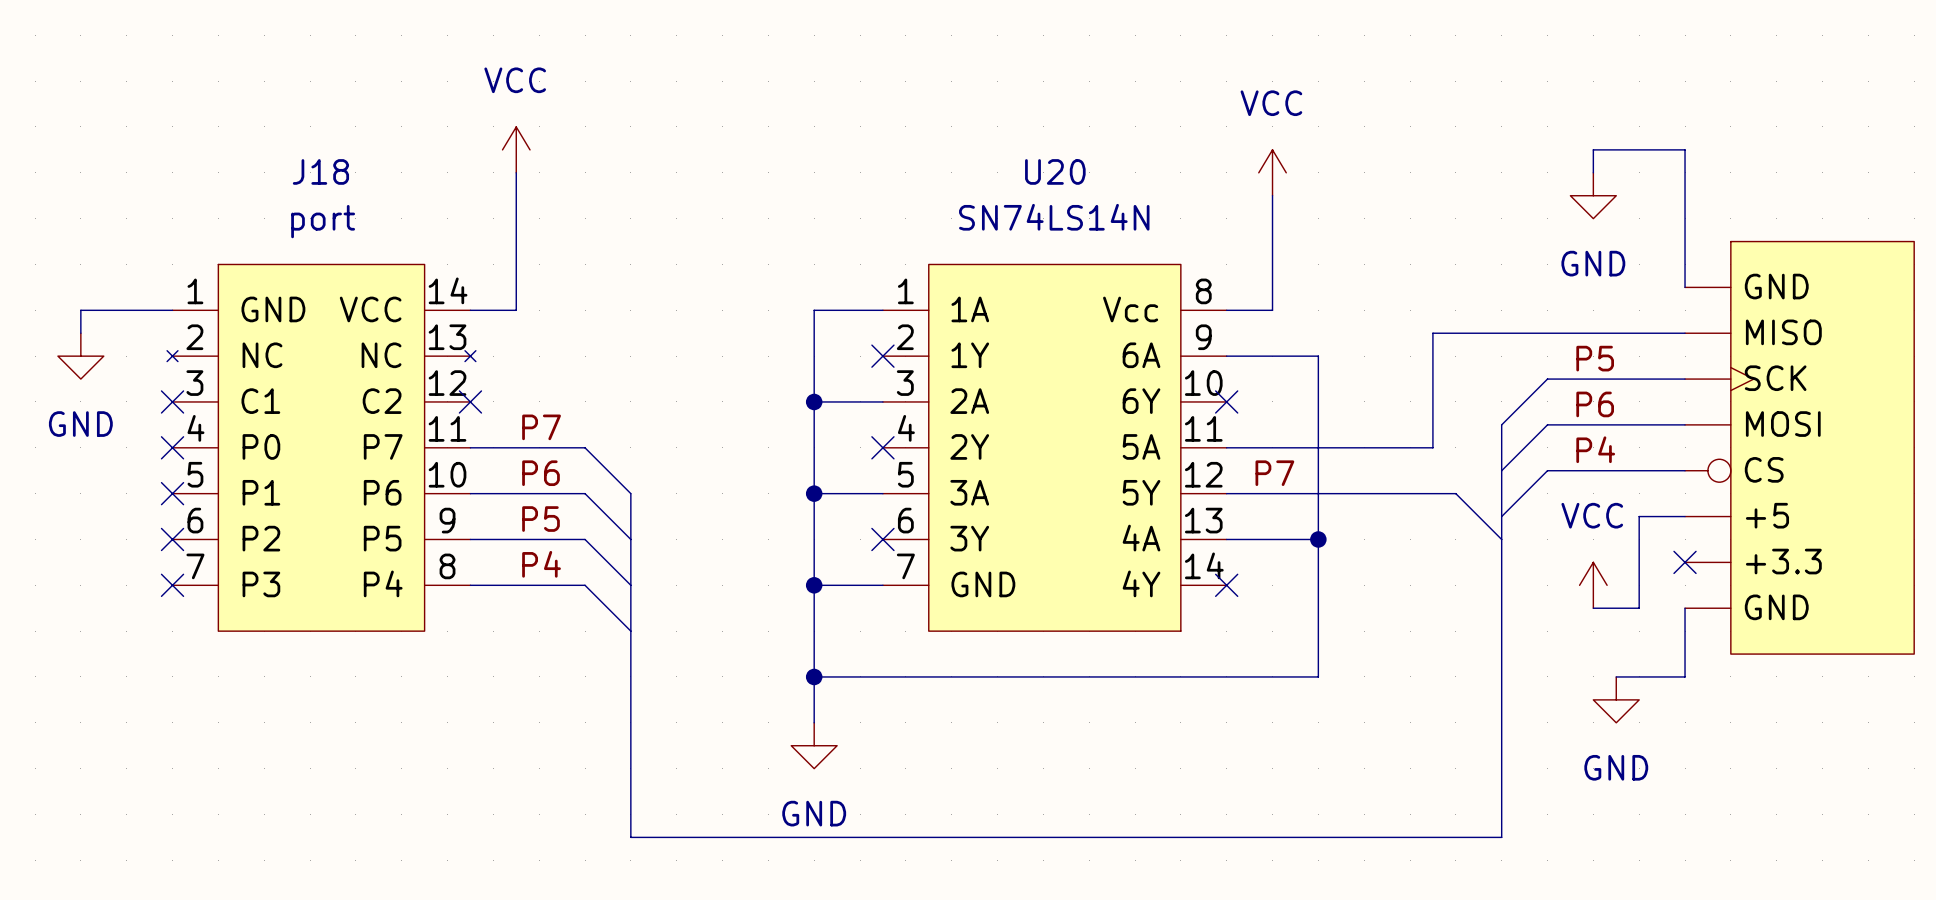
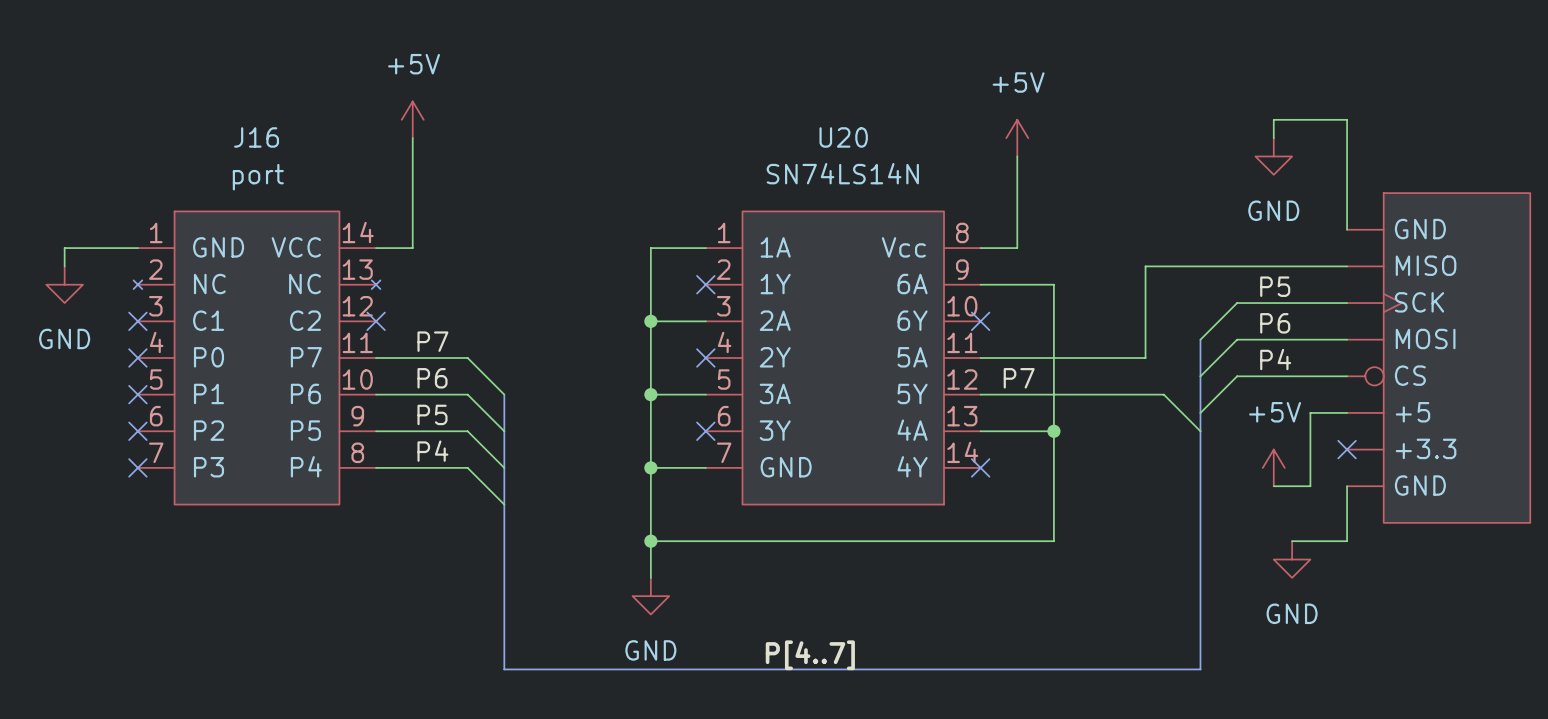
power symbol: VCC (516, 149) -> +5V (412, 119)
J18 name: J18 (320, 171) -> J16 (256, 137)
power symbol: VCC (1272, 172) -> +5V (1017, 138)
power symbol: VCC (1593, 585) -> +5V (1273, 467)
label: none -> P[4..7] (810, 655)

